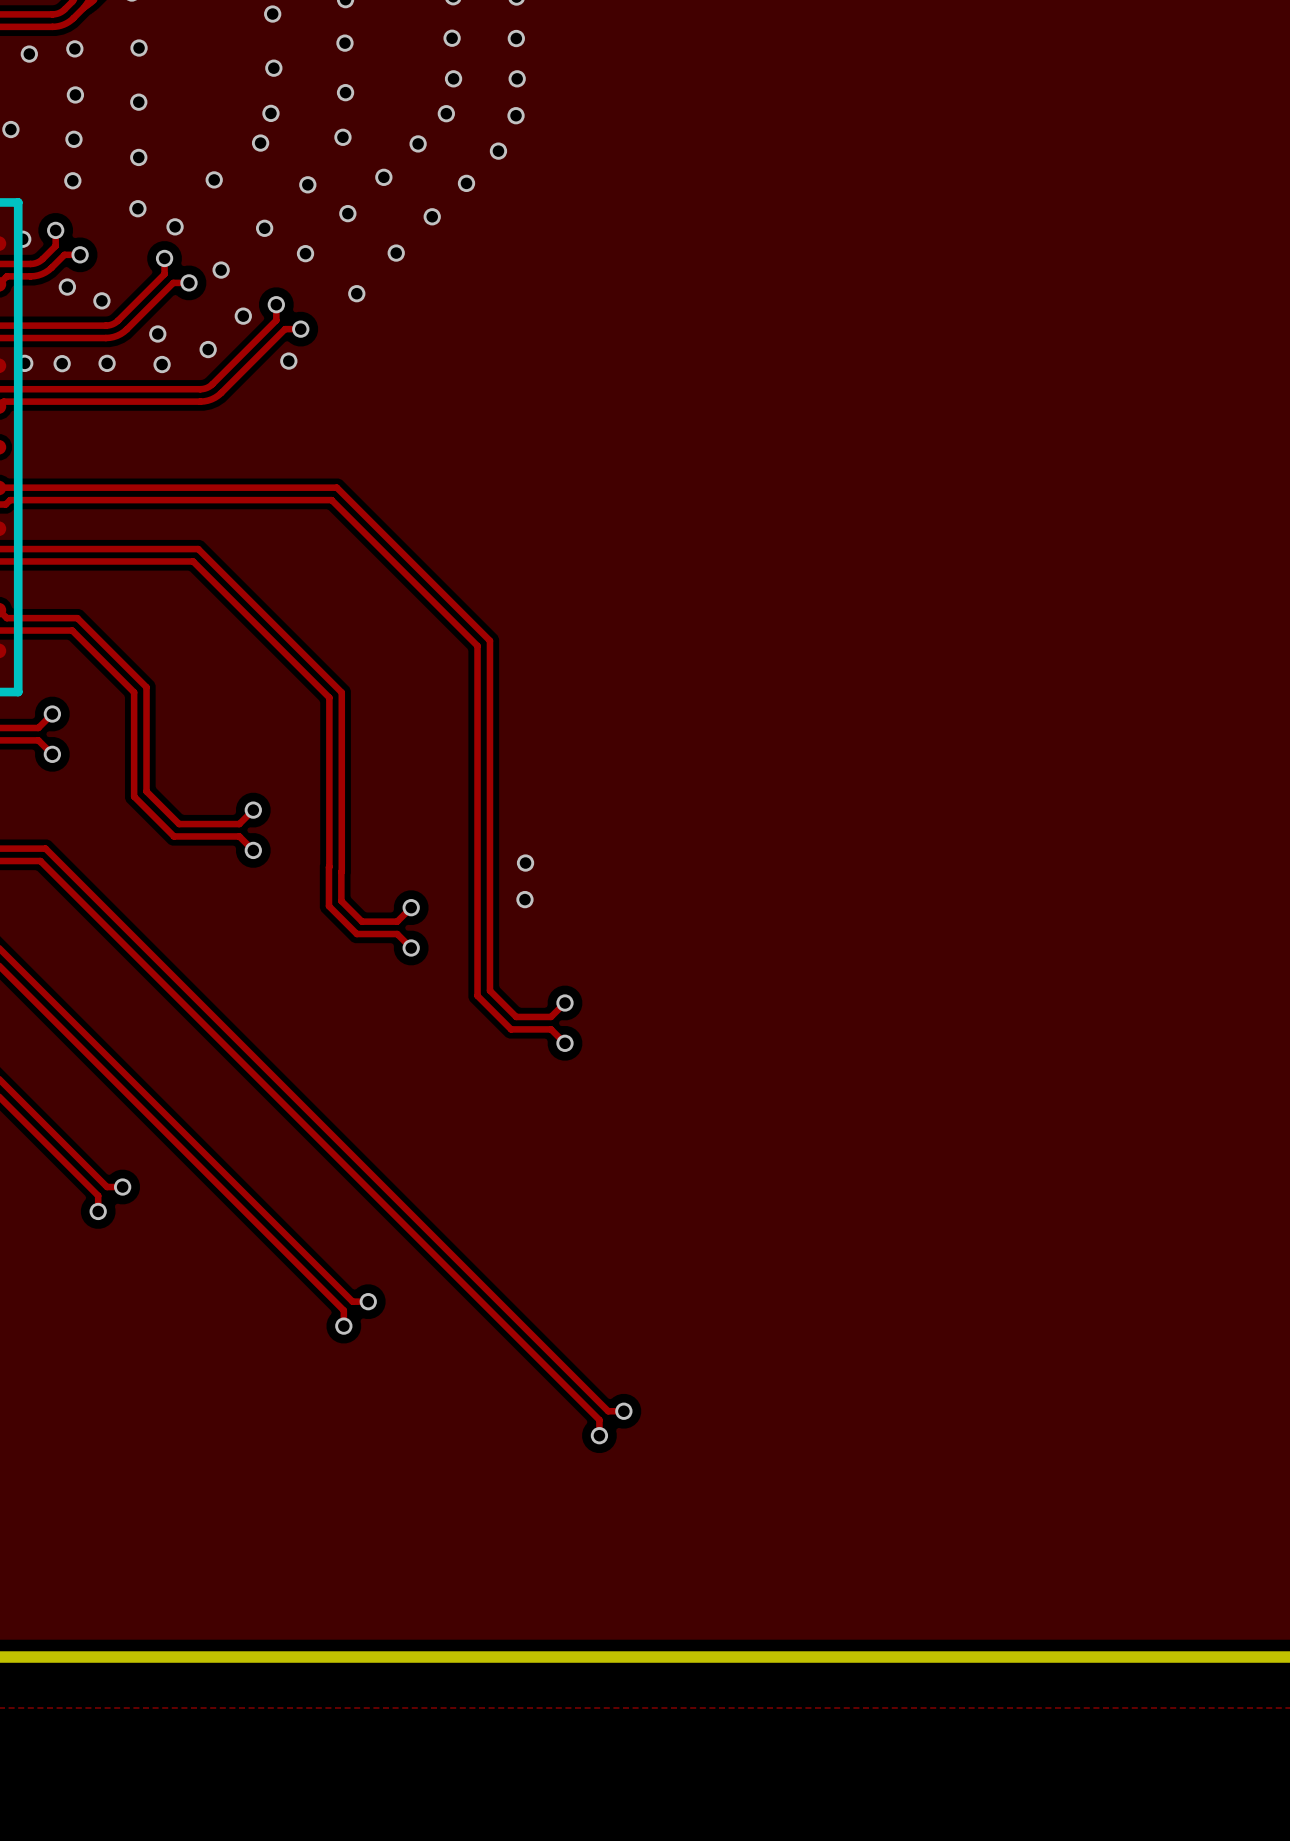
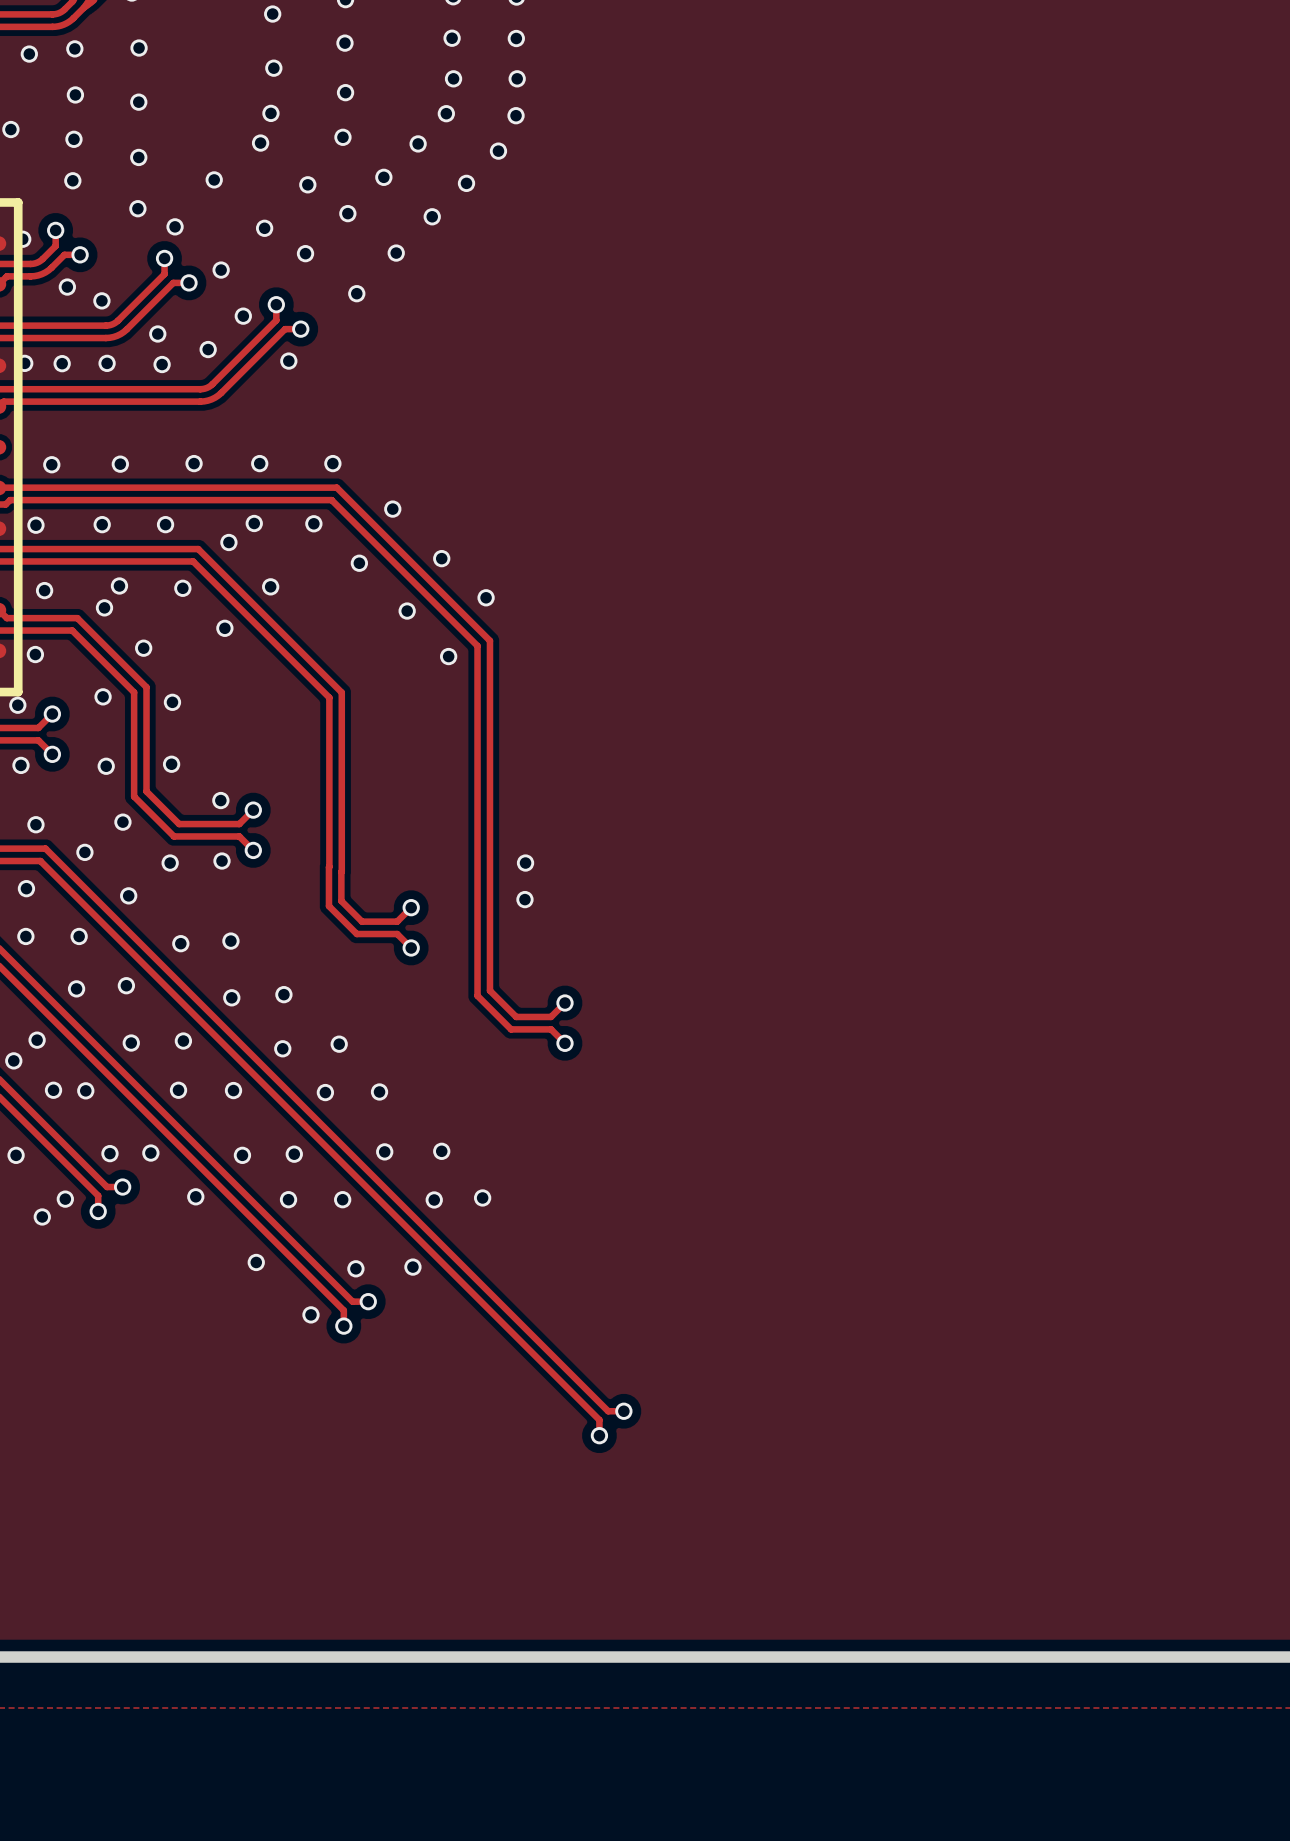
via: none -> (194, 463)
via: none -> (259, 463)
via: none -> (332, 463)
via: none -> (51, 464)
via: none -> (120, 464)
via: none -> (392, 509)
via: none -> (254, 523)
via: none -> (313, 523)
via: none -> (102, 524)
via: none -> (165, 524)
via: none -> (35, 525)
via: none -> (228, 542)
via: none -> (441, 558)
via: none -> (359, 563)
via: none -> (119, 585)
via: none -> (270, 586)
via: none -> (182, 588)
via: none -> (44, 590)
via: none -> (486, 597)
via: none -> (104, 607)
via: none -> (407, 611)
via: none -> (224, 628)
via: none -> (143, 648)
via: none -> (35, 654)
via: none -> (448, 656)
via: none -> (103, 696)
via: none -> (172, 702)
via: none -> (17, 705)
via: none -> (171, 764)
via: none -> (20, 765)
via: none -> (106, 766)
via: none -> (220, 800)
via: none -> (122, 822)
via: none -> (35, 824)
via: none -> (84, 852)
via: none -> (221, 861)
via: none -> (170, 863)
via: none -> (26, 888)
via: none -> (128, 895)
via: none -> (25, 936)
via: none -> (79, 936)
via: none -> (230, 941)
via: none -> (180, 943)
via: none -> (126, 985)
via: none -> (76, 988)
via: none -> (283, 994)
via: none -> (231, 997)
via: none -> (37, 1040)
via: none -> (183, 1041)
via: none -> (131, 1043)
via: none -> (339, 1044)
via: none -> (282, 1048)
via: none -> (13, 1060)
via: none -> (53, 1090)
via: none -> (85, 1090)
via: none -> (178, 1090)
via: none -> (233, 1090)
via: none -> (379, 1091)
via: none -> (325, 1092)
via: none -> (384, 1151)
via: none -> (441, 1151)
via: none -> (109, 1153)
via: none -> (150, 1153)
via: none -> (294, 1154)
via: none -> (16, 1155)
via: none -> (242, 1155)
via: none -> (195, 1196)
via: none -> (482, 1197)
via: none -> (65, 1199)
via: none -> (288, 1199)
via: none -> (342, 1199)
via: none -> (434, 1199)
via: none -> (42, 1216)
via: none -> (256, 1262)
via: none -> (412, 1267)
via: none -> (355, 1268)
via: none -> (310, 1314)

